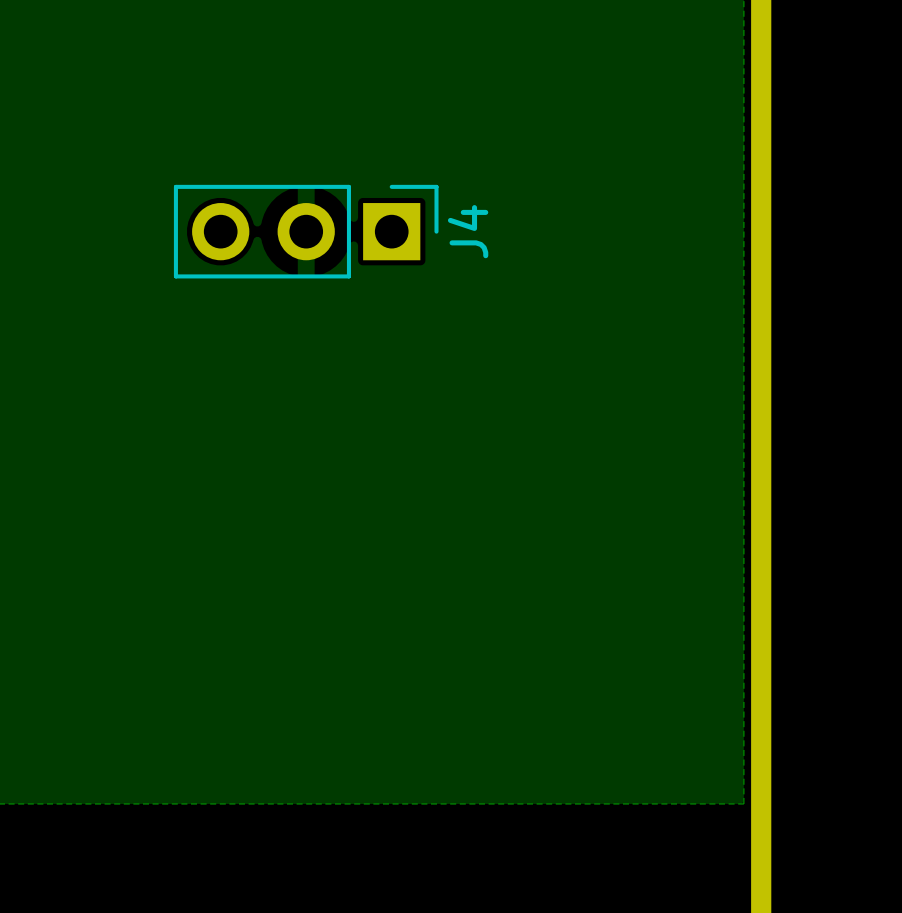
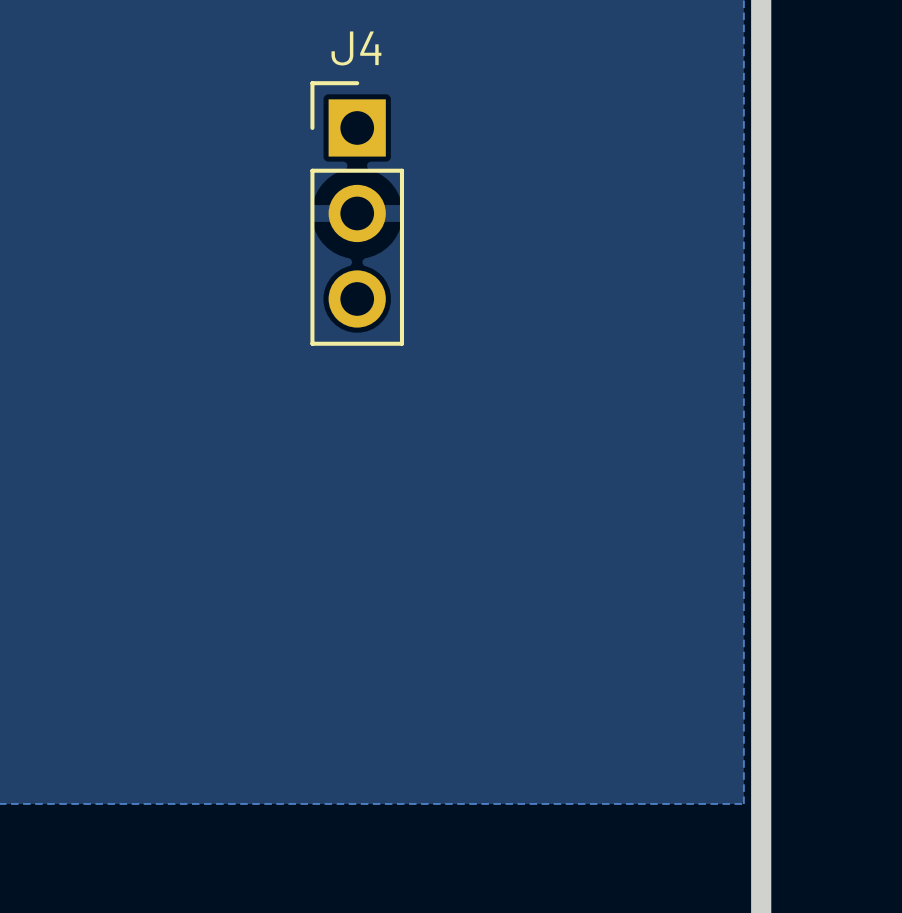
J4 rotation: 0° (306, 231) -> 90° counterclockwise (357, 213)

